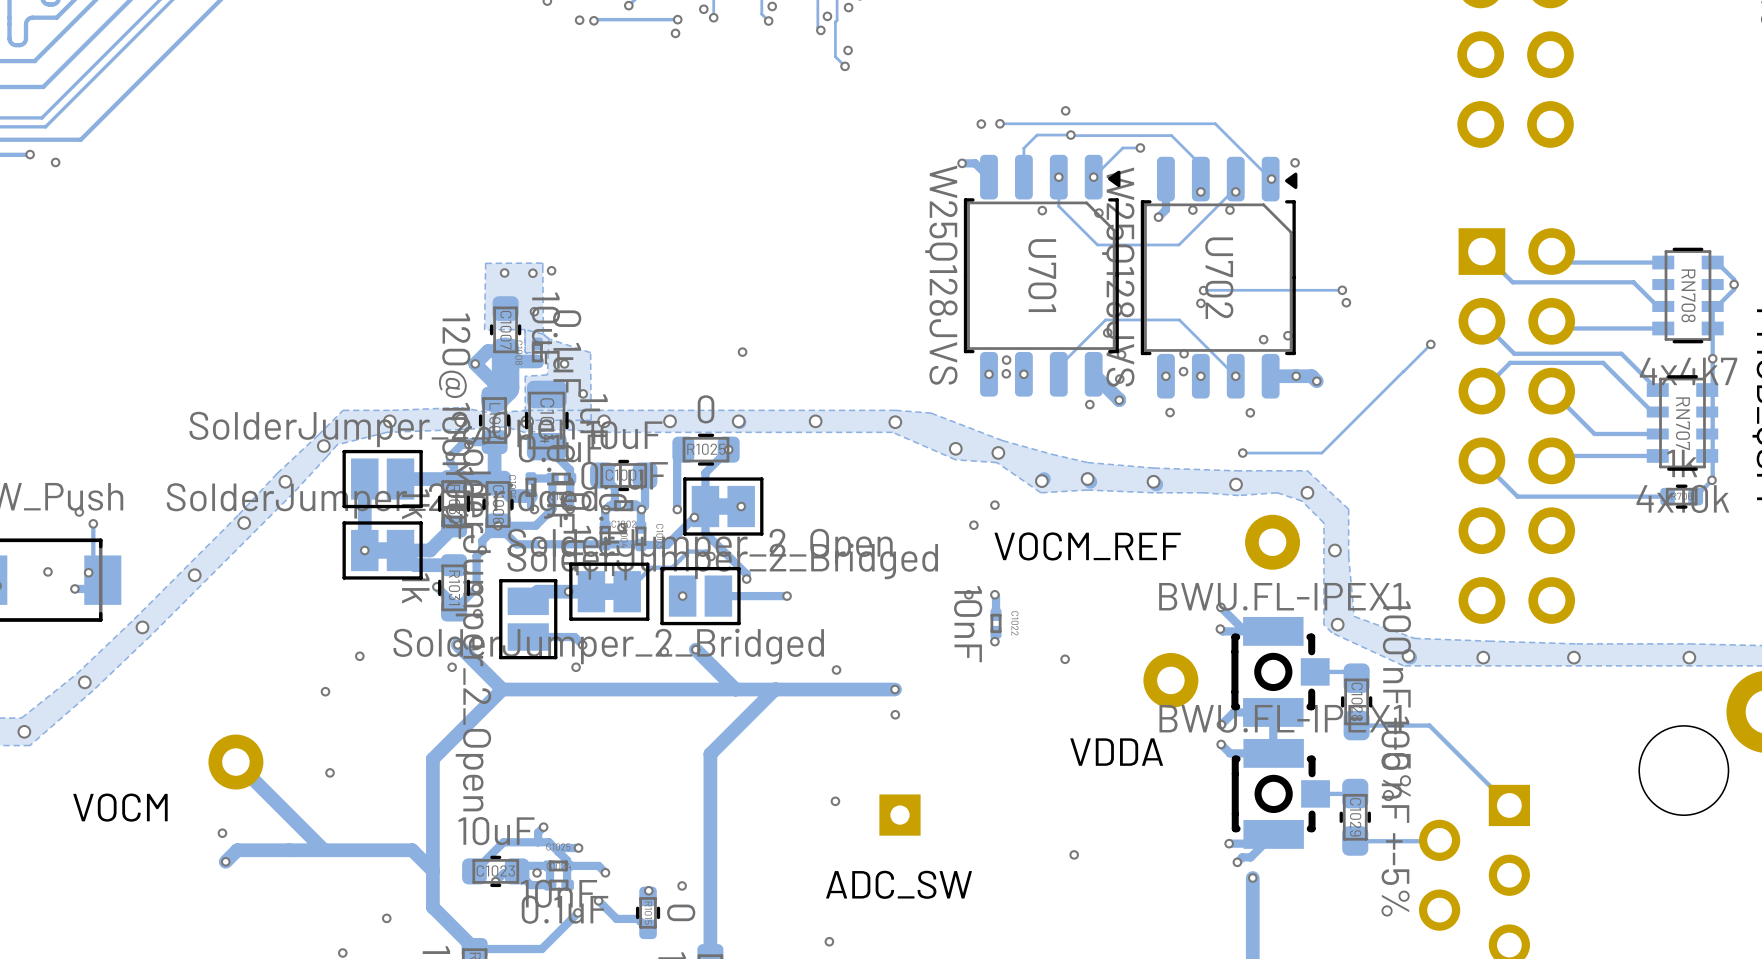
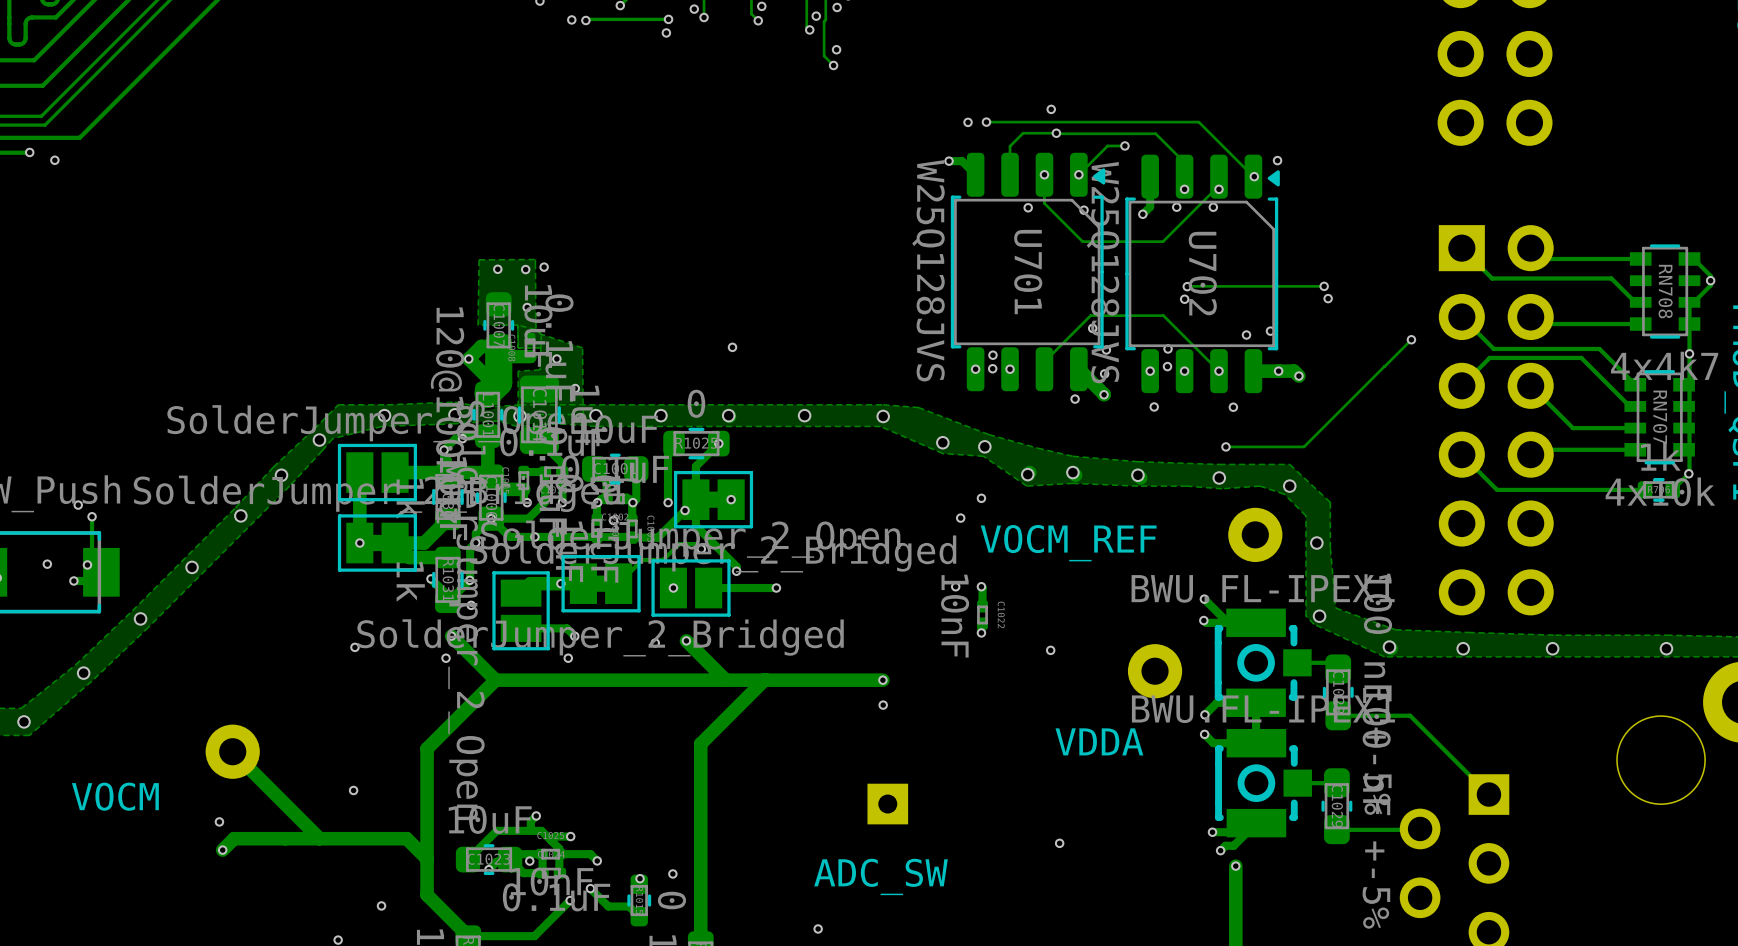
via: (836, 670) -> none
via: (325, 691) -> none
via position: (330, 772) -> (353, 790)
via: (835, 801) -> none

